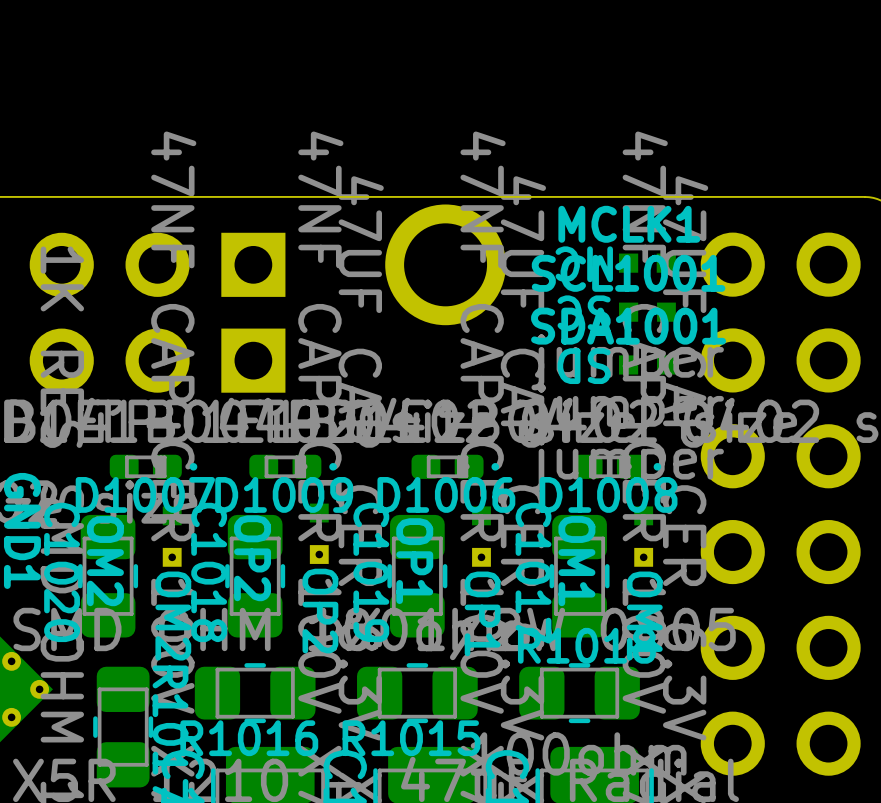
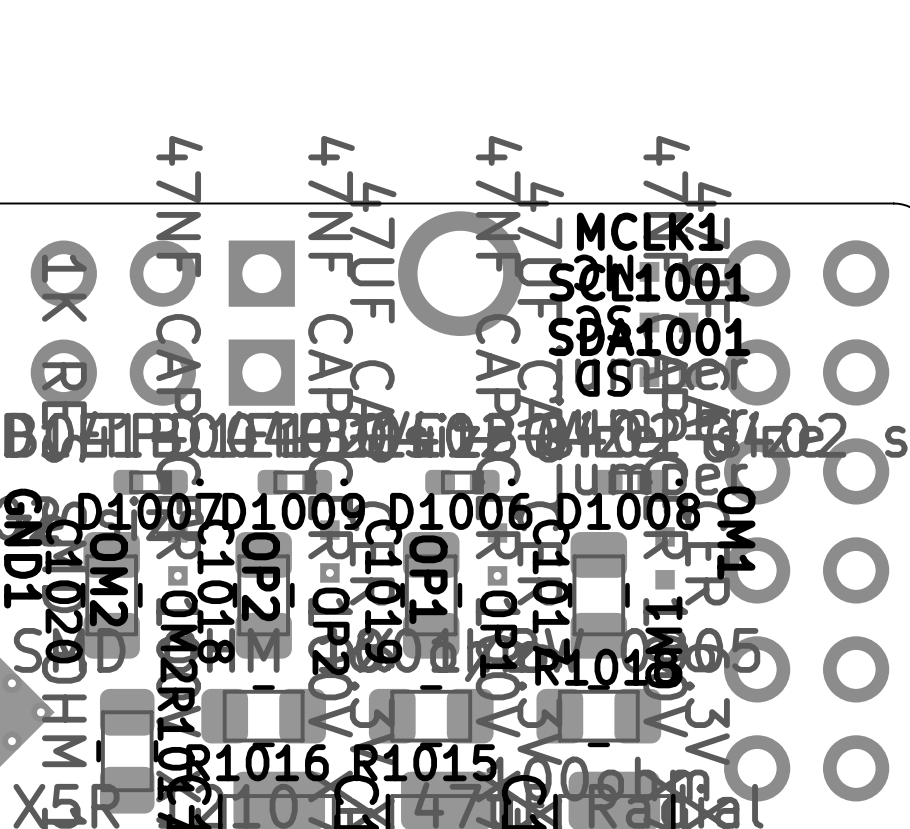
OM1 footprint: [634, 506, 654, 567] -> [655, 527, 675, 590]
OM1 name position: OM1 (576, 561) -> OM1 (736, 533)

